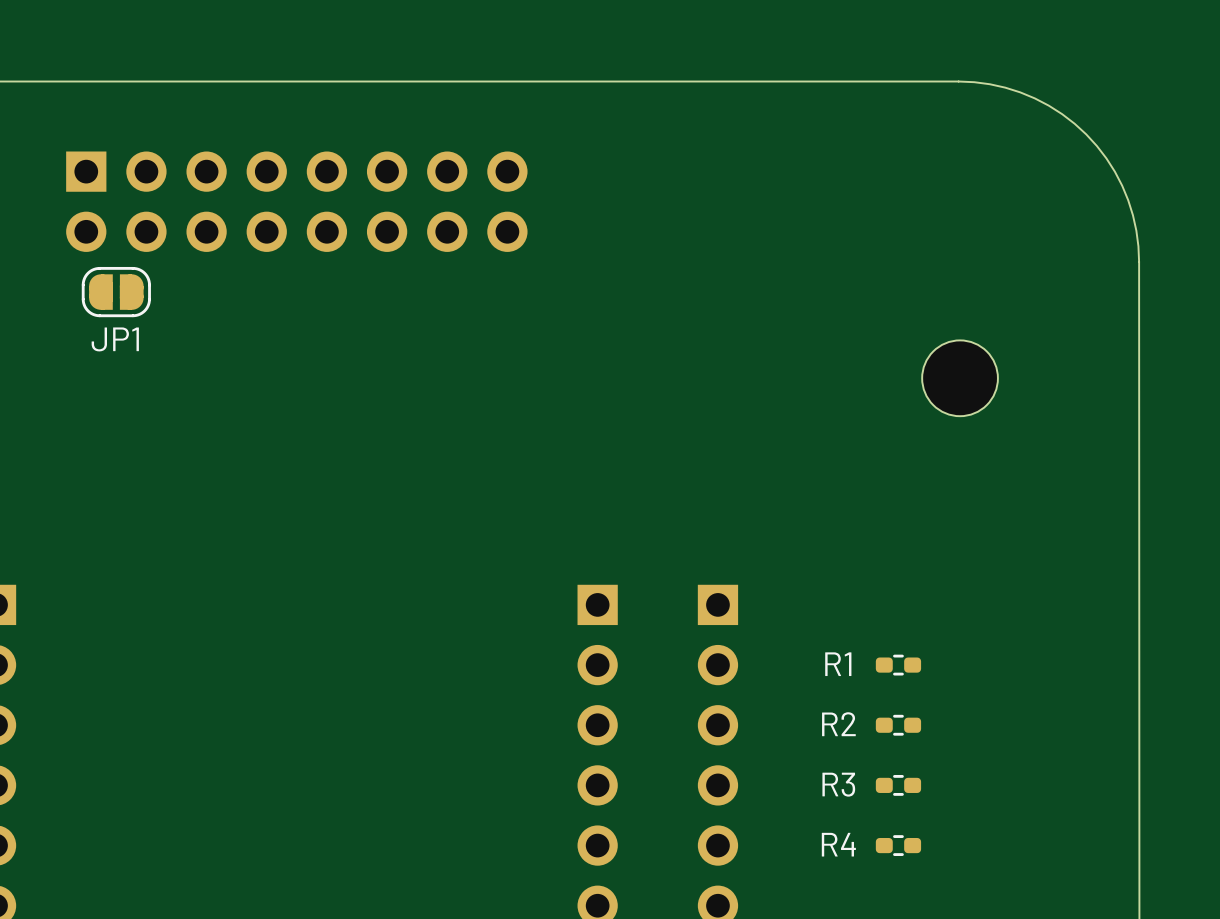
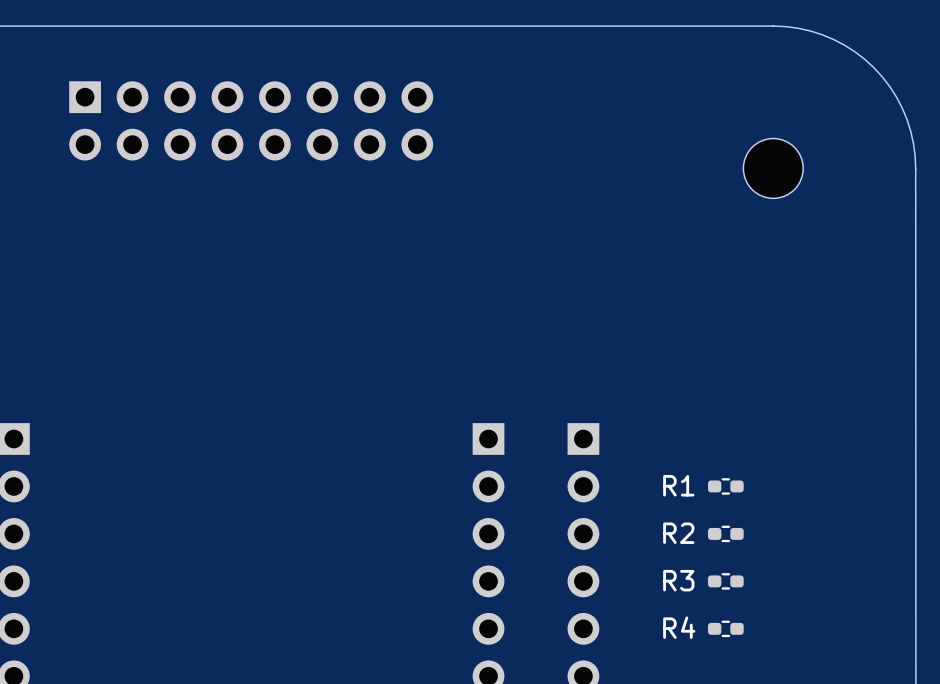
JP1: (116, 292) -> none
part position: (960, 378) -> (773, 168)

